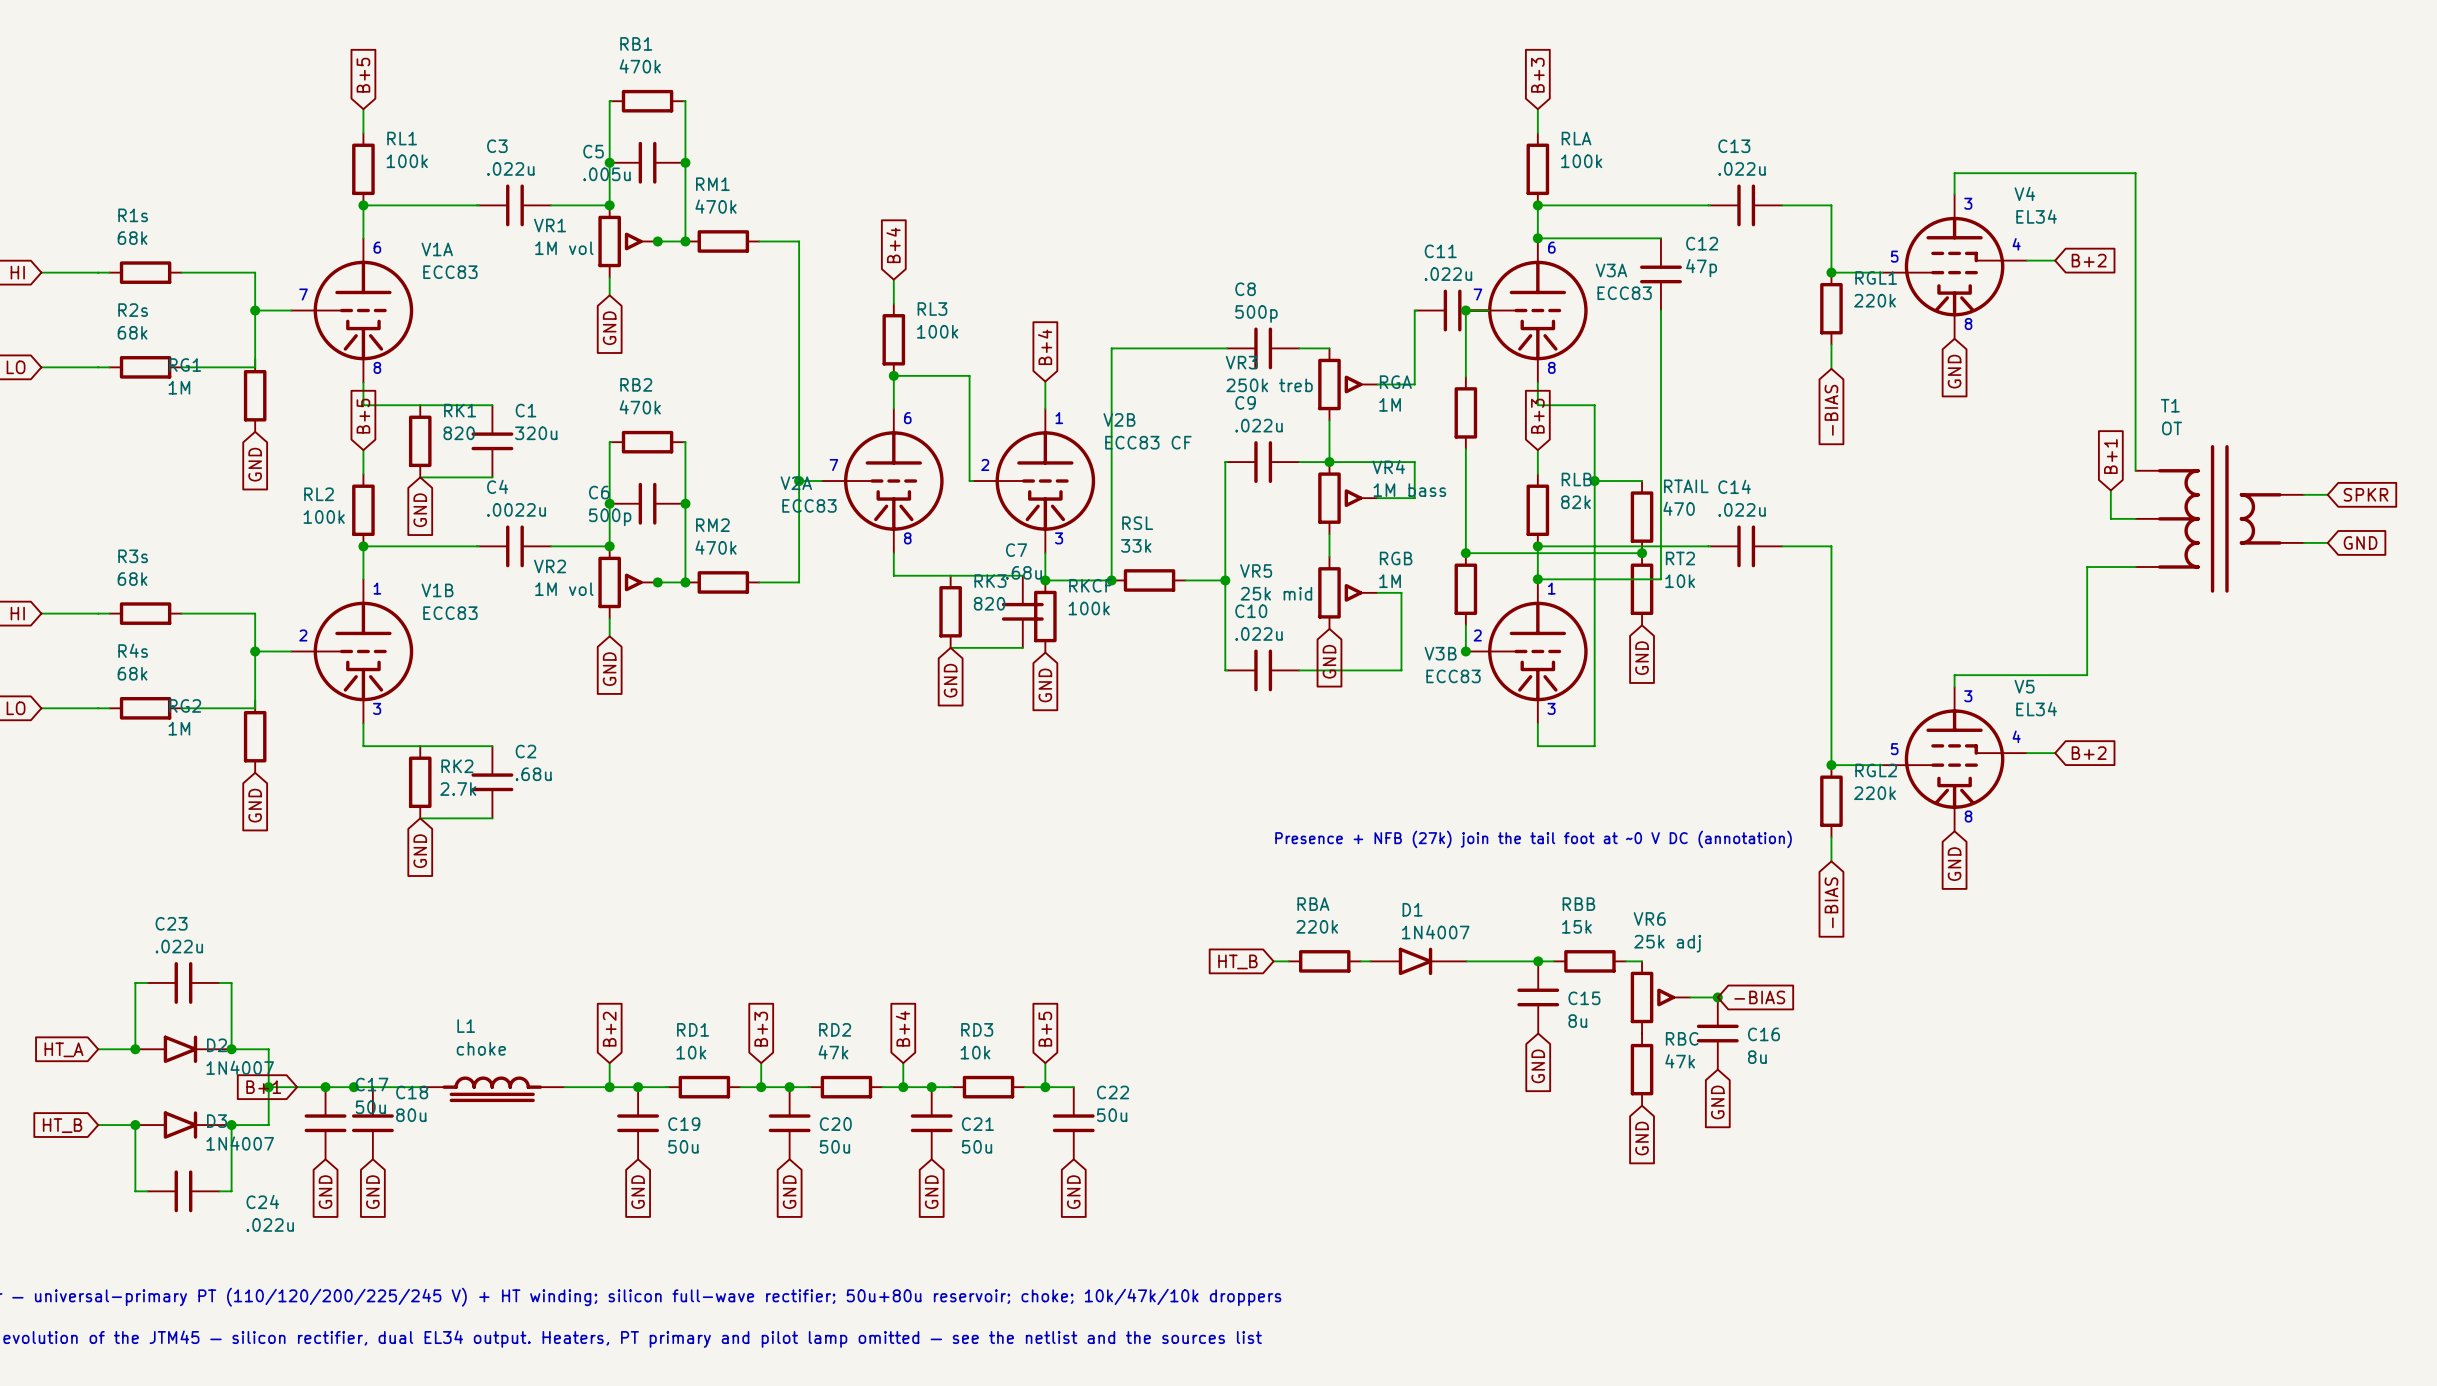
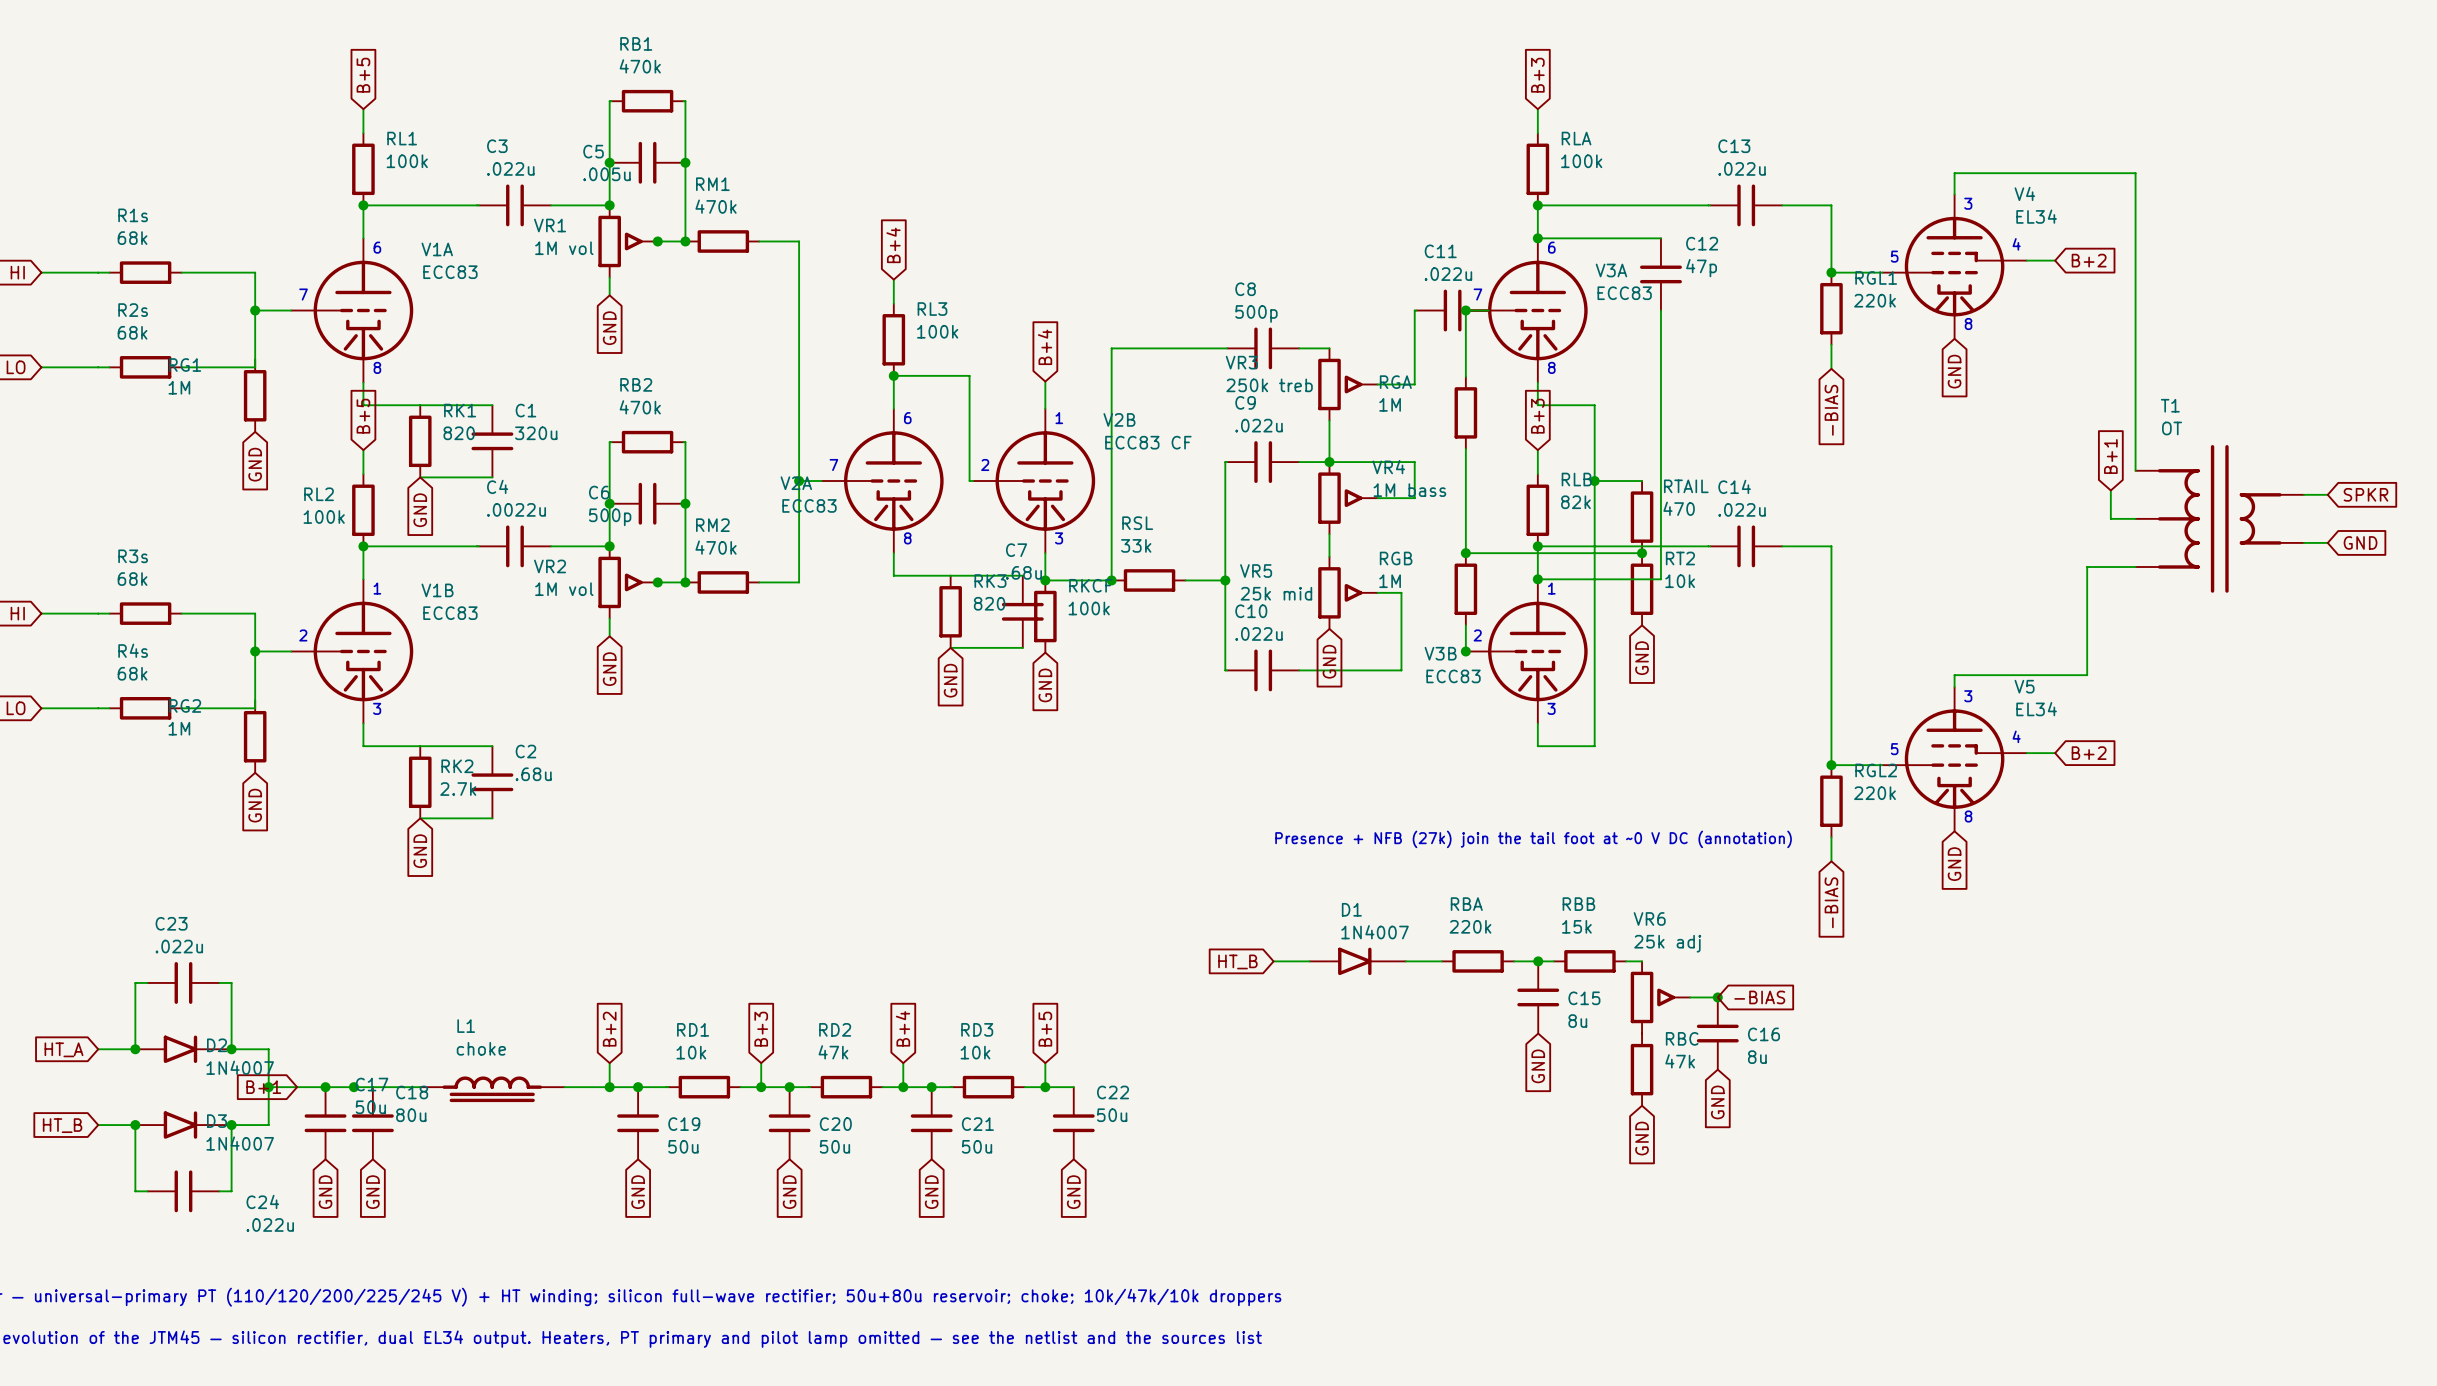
RBA position: (1324, 961) -> (1478, 961)
wire: none -> (1405, 961) (1442, 961)
D1 position: (1418, 961) -> (1357, 961)
wire: (1466, 961) (1514, 961) -> none

